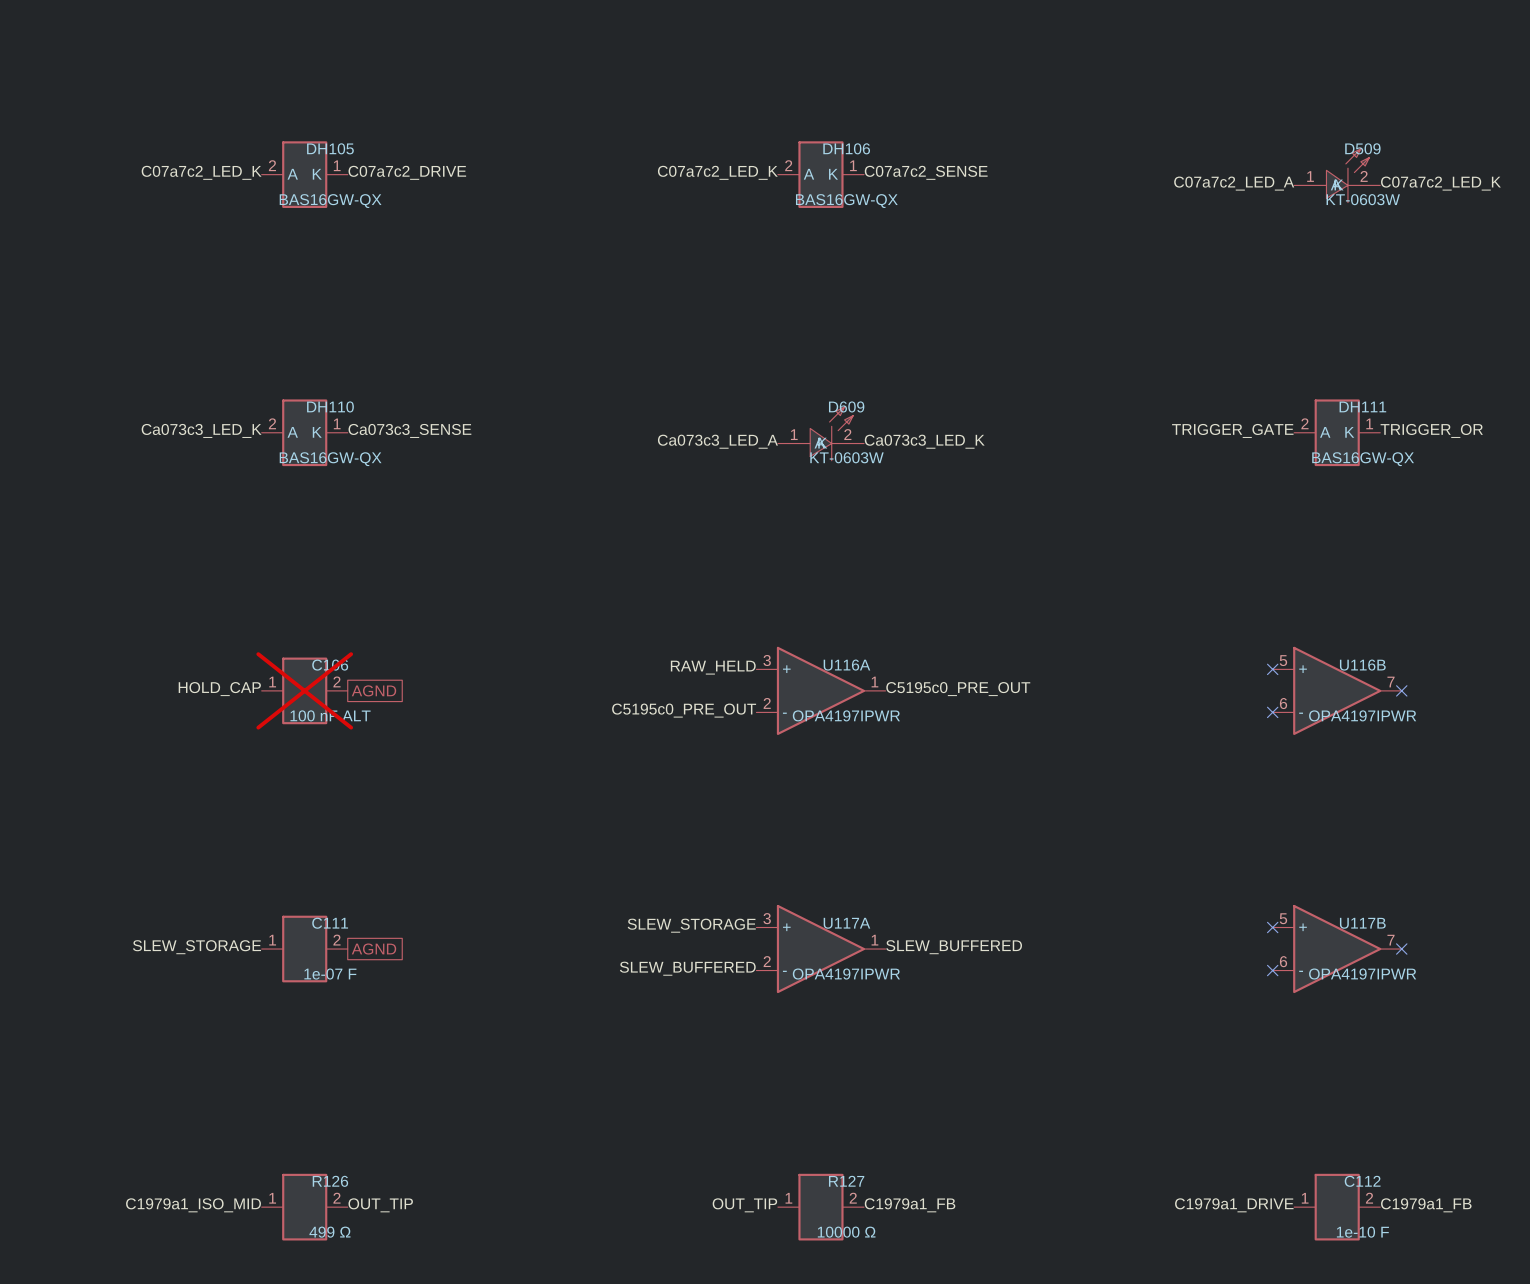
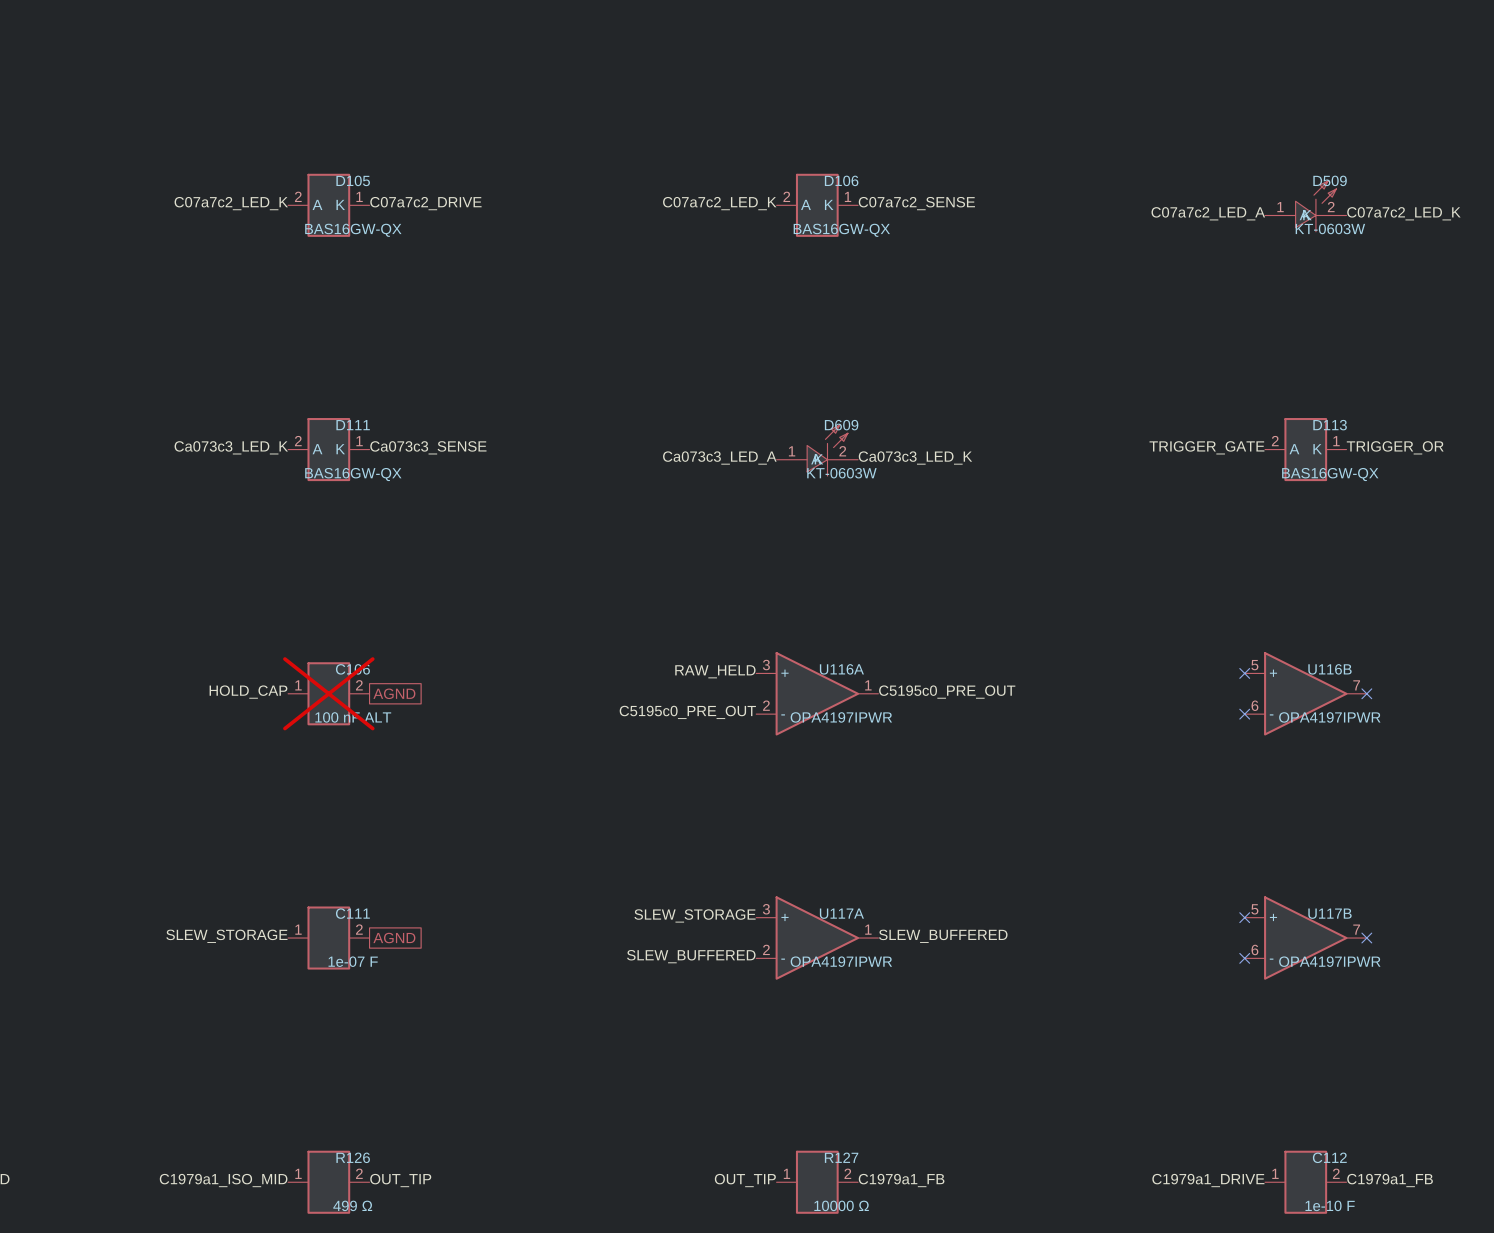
DH105 name: DH105 (330, 148) -> D105 (353, 180)
DH106 name: DH106 (846, 148) -> D106 (841, 180)
DH110 name: DH110 (330, 406) -> D111 (353, 425)
DH111 name: DH111 (1362, 406) -> D113 (1330, 425)

